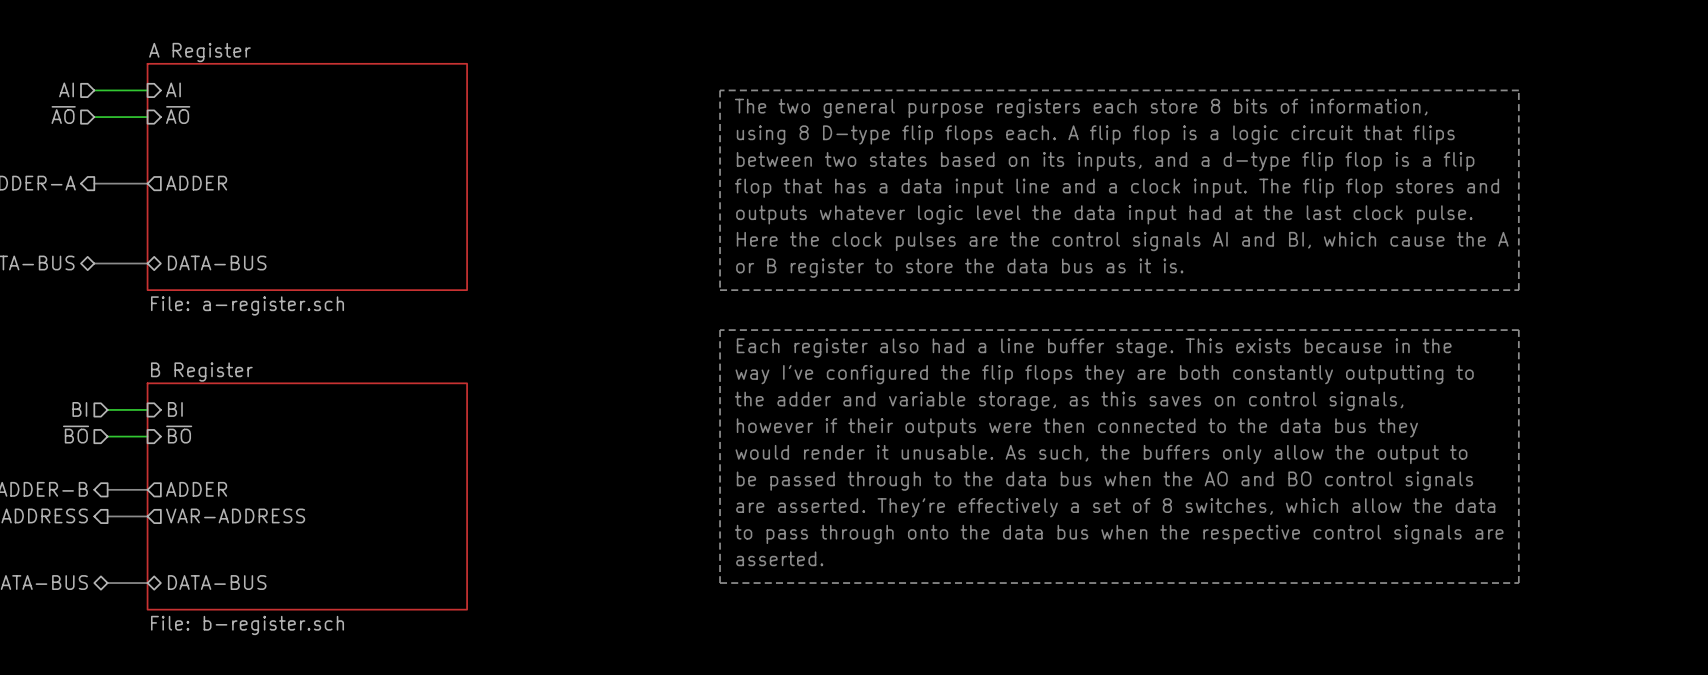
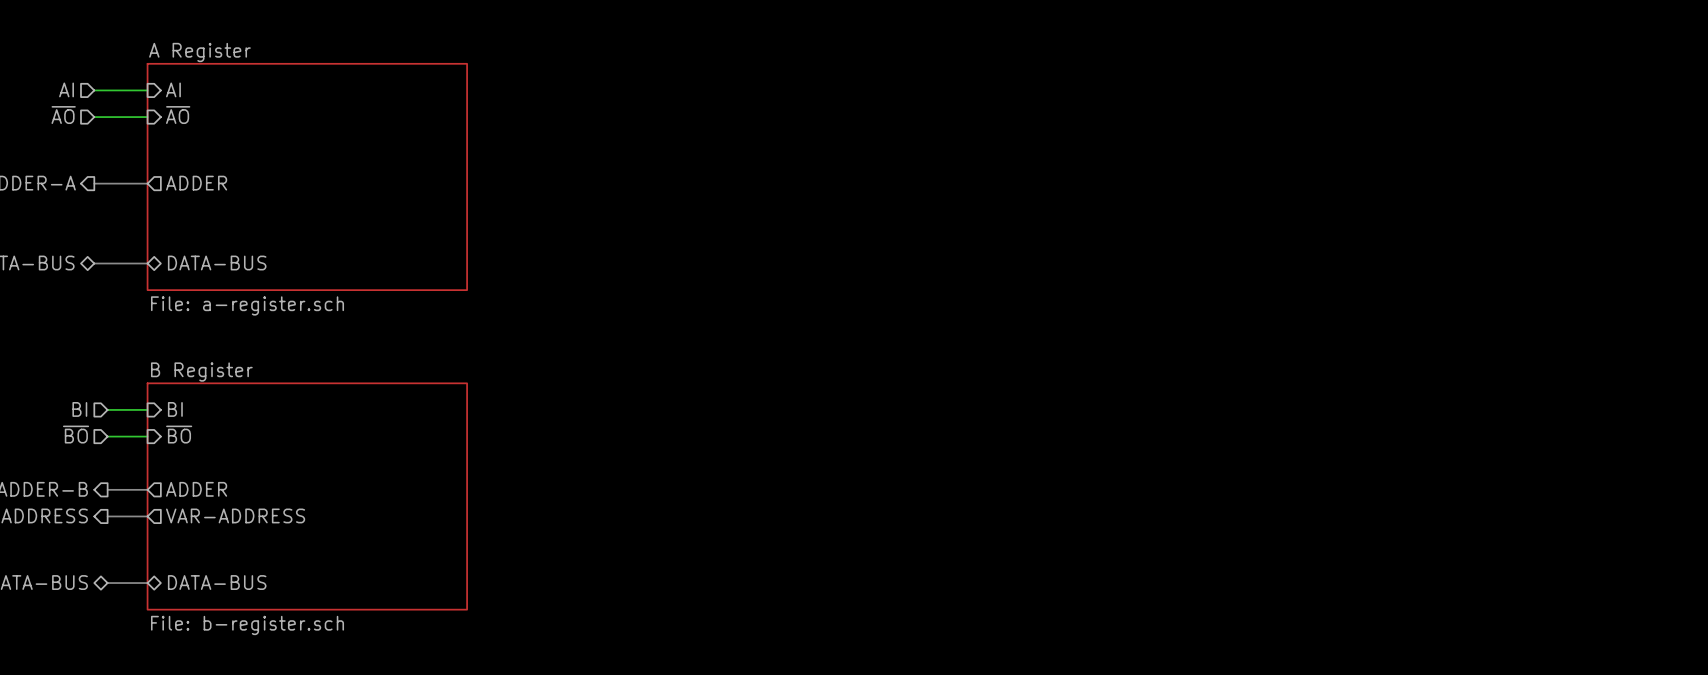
line: (720, 90) (720, 290) (1518, 290) (1518, 90) (720, 90) -> none
text: The two general purpose registers each store 8 bits of information, (1081, 108) -> none
text: using 8 D-type flip flops each. A flip flop is a logic circuit that flips (1095, 135) -> none
text: between two states based on its inputs, and a d-type flip flop is a flip (1105, 161) -> none
text: flop that has a data input line and a clock input. The flip flop stores and (1117, 188) -> none
text: outputs whatever logic level the data input had at the last clock pulse. (1104, 214) -> none
text: Here the clock pulses are the control signals AI and BI, which cause the A (1122, 241) -> none
text: or B register to store the data bus as it is. (959, 268) -> none
line: (720, 330) (720, 583) (1518, 583) (1518, 330) (720, 330) -> none
text: Each register also had a line buffer stage. This exists because in the (1094, 348) -> none
text: way I've configured the flip flops they are both constantly outputting to (1104, 374) -> none
text: the adder and variable storage, as this saves on control signals, (1069, 401) -> none
text: however if their outputs were then connected to the data bus they (1077, 427) -> none
text: would render it unusable. As such, the buffers only allow the output to (1101, 454) -> none
text: be passed through to the data bus when the AO and BO control signals (1104, 481) -> none
text: are asserted. They're effectively a set of 8 switches, which allow the data (1115, 507) -> none
text: to pass through onto the data bus when the respective control signals are (1119, 534) -> none
text: asserted. (779, 558) -> none

